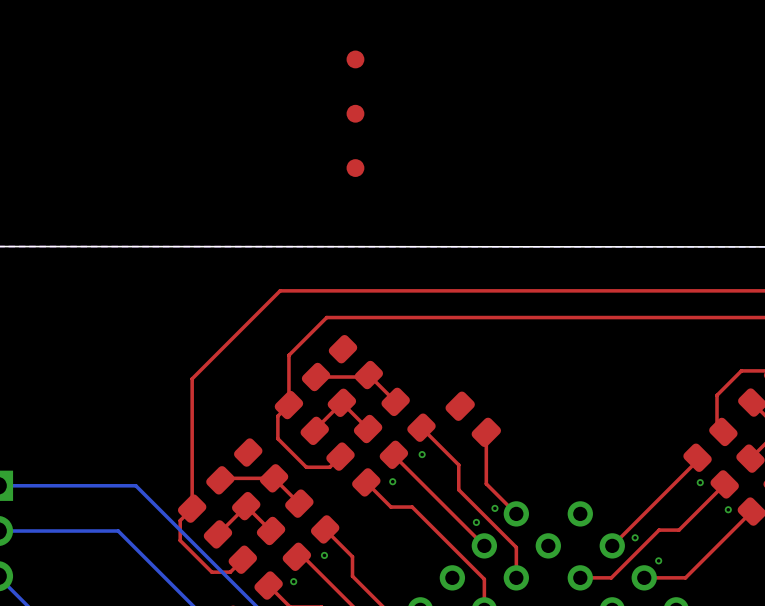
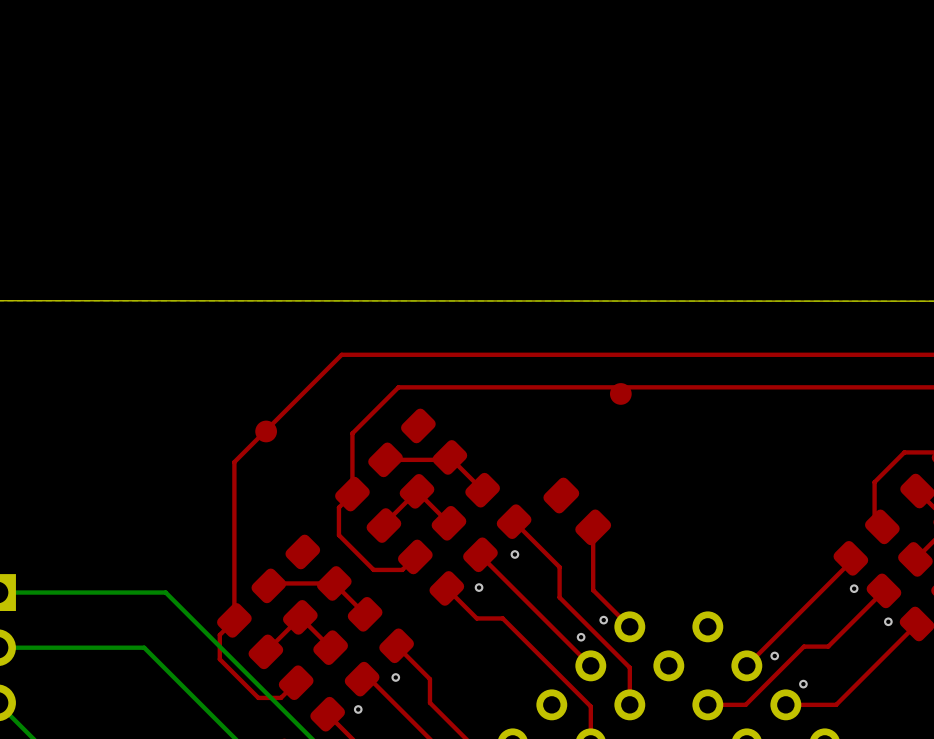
part: (355, 59) -> none
part: (355, 113) -> none
part: (355, 168) -> none
part: none -> (620, 393)
part: none -> (266, 431)

